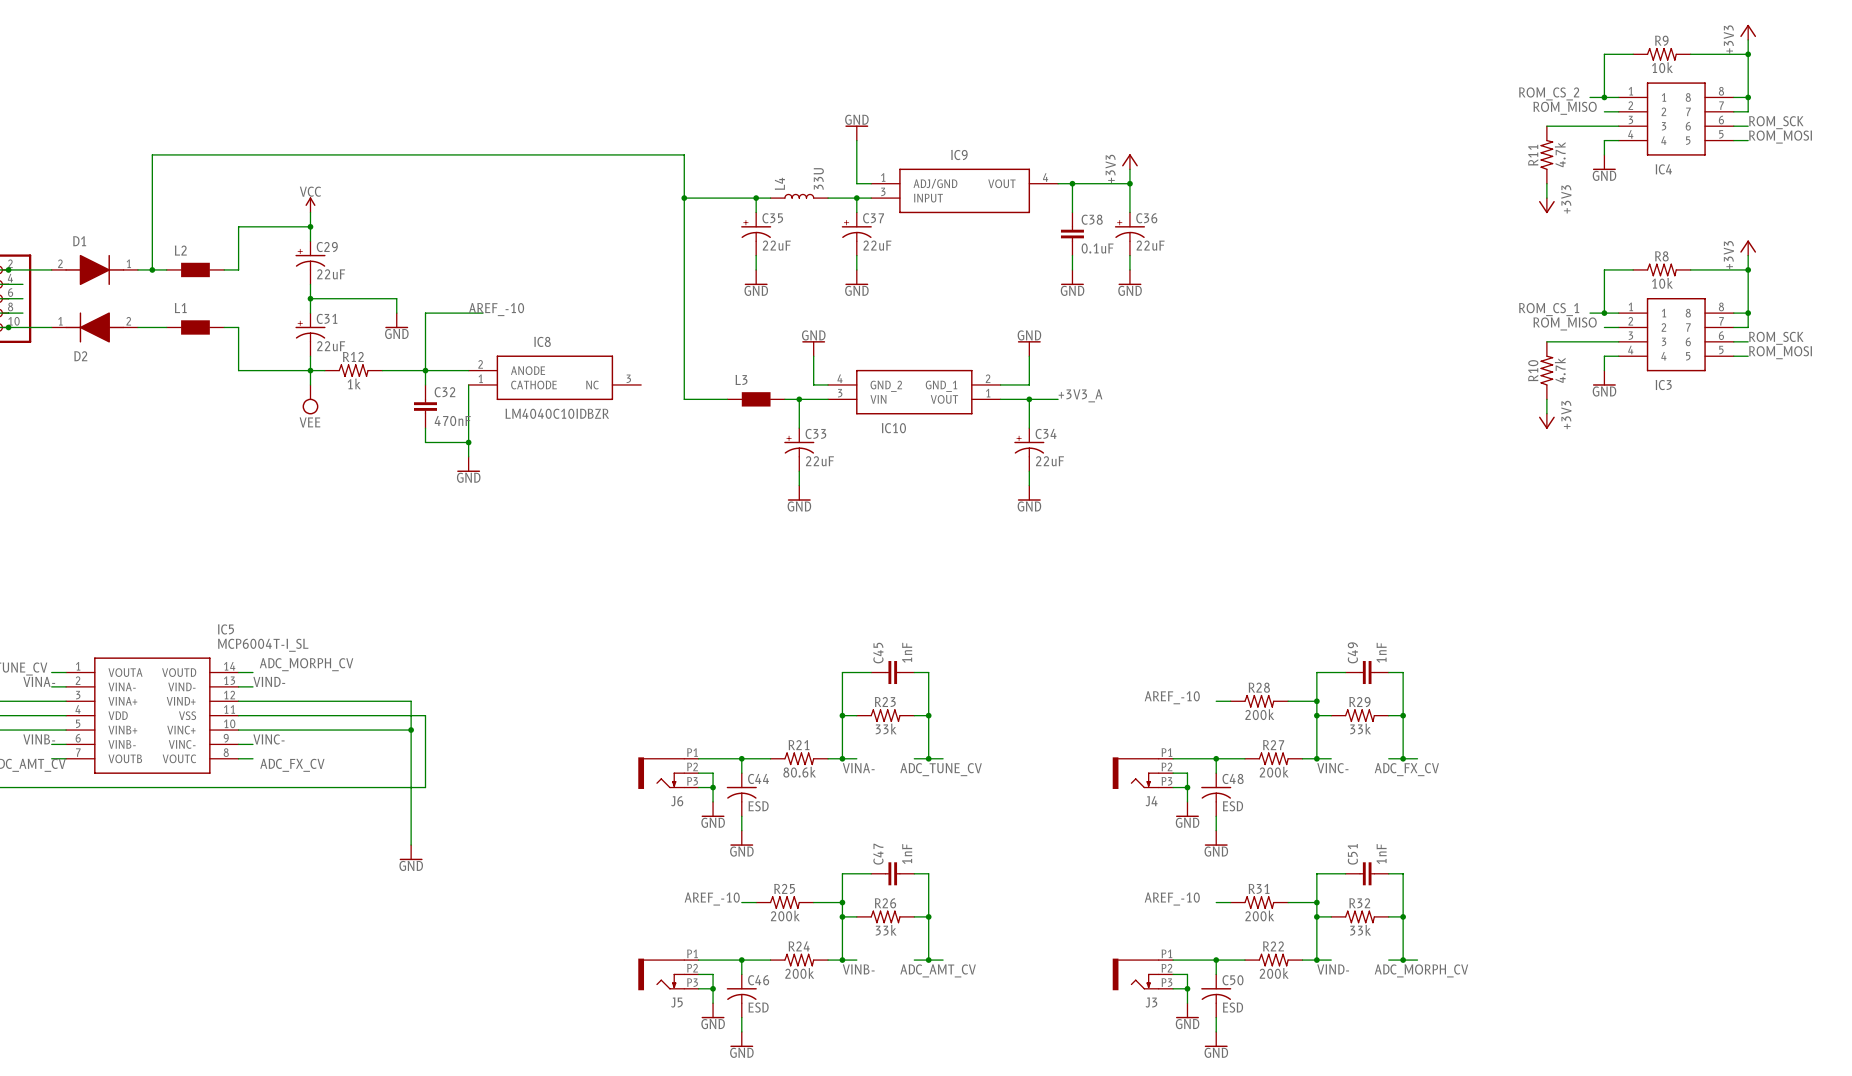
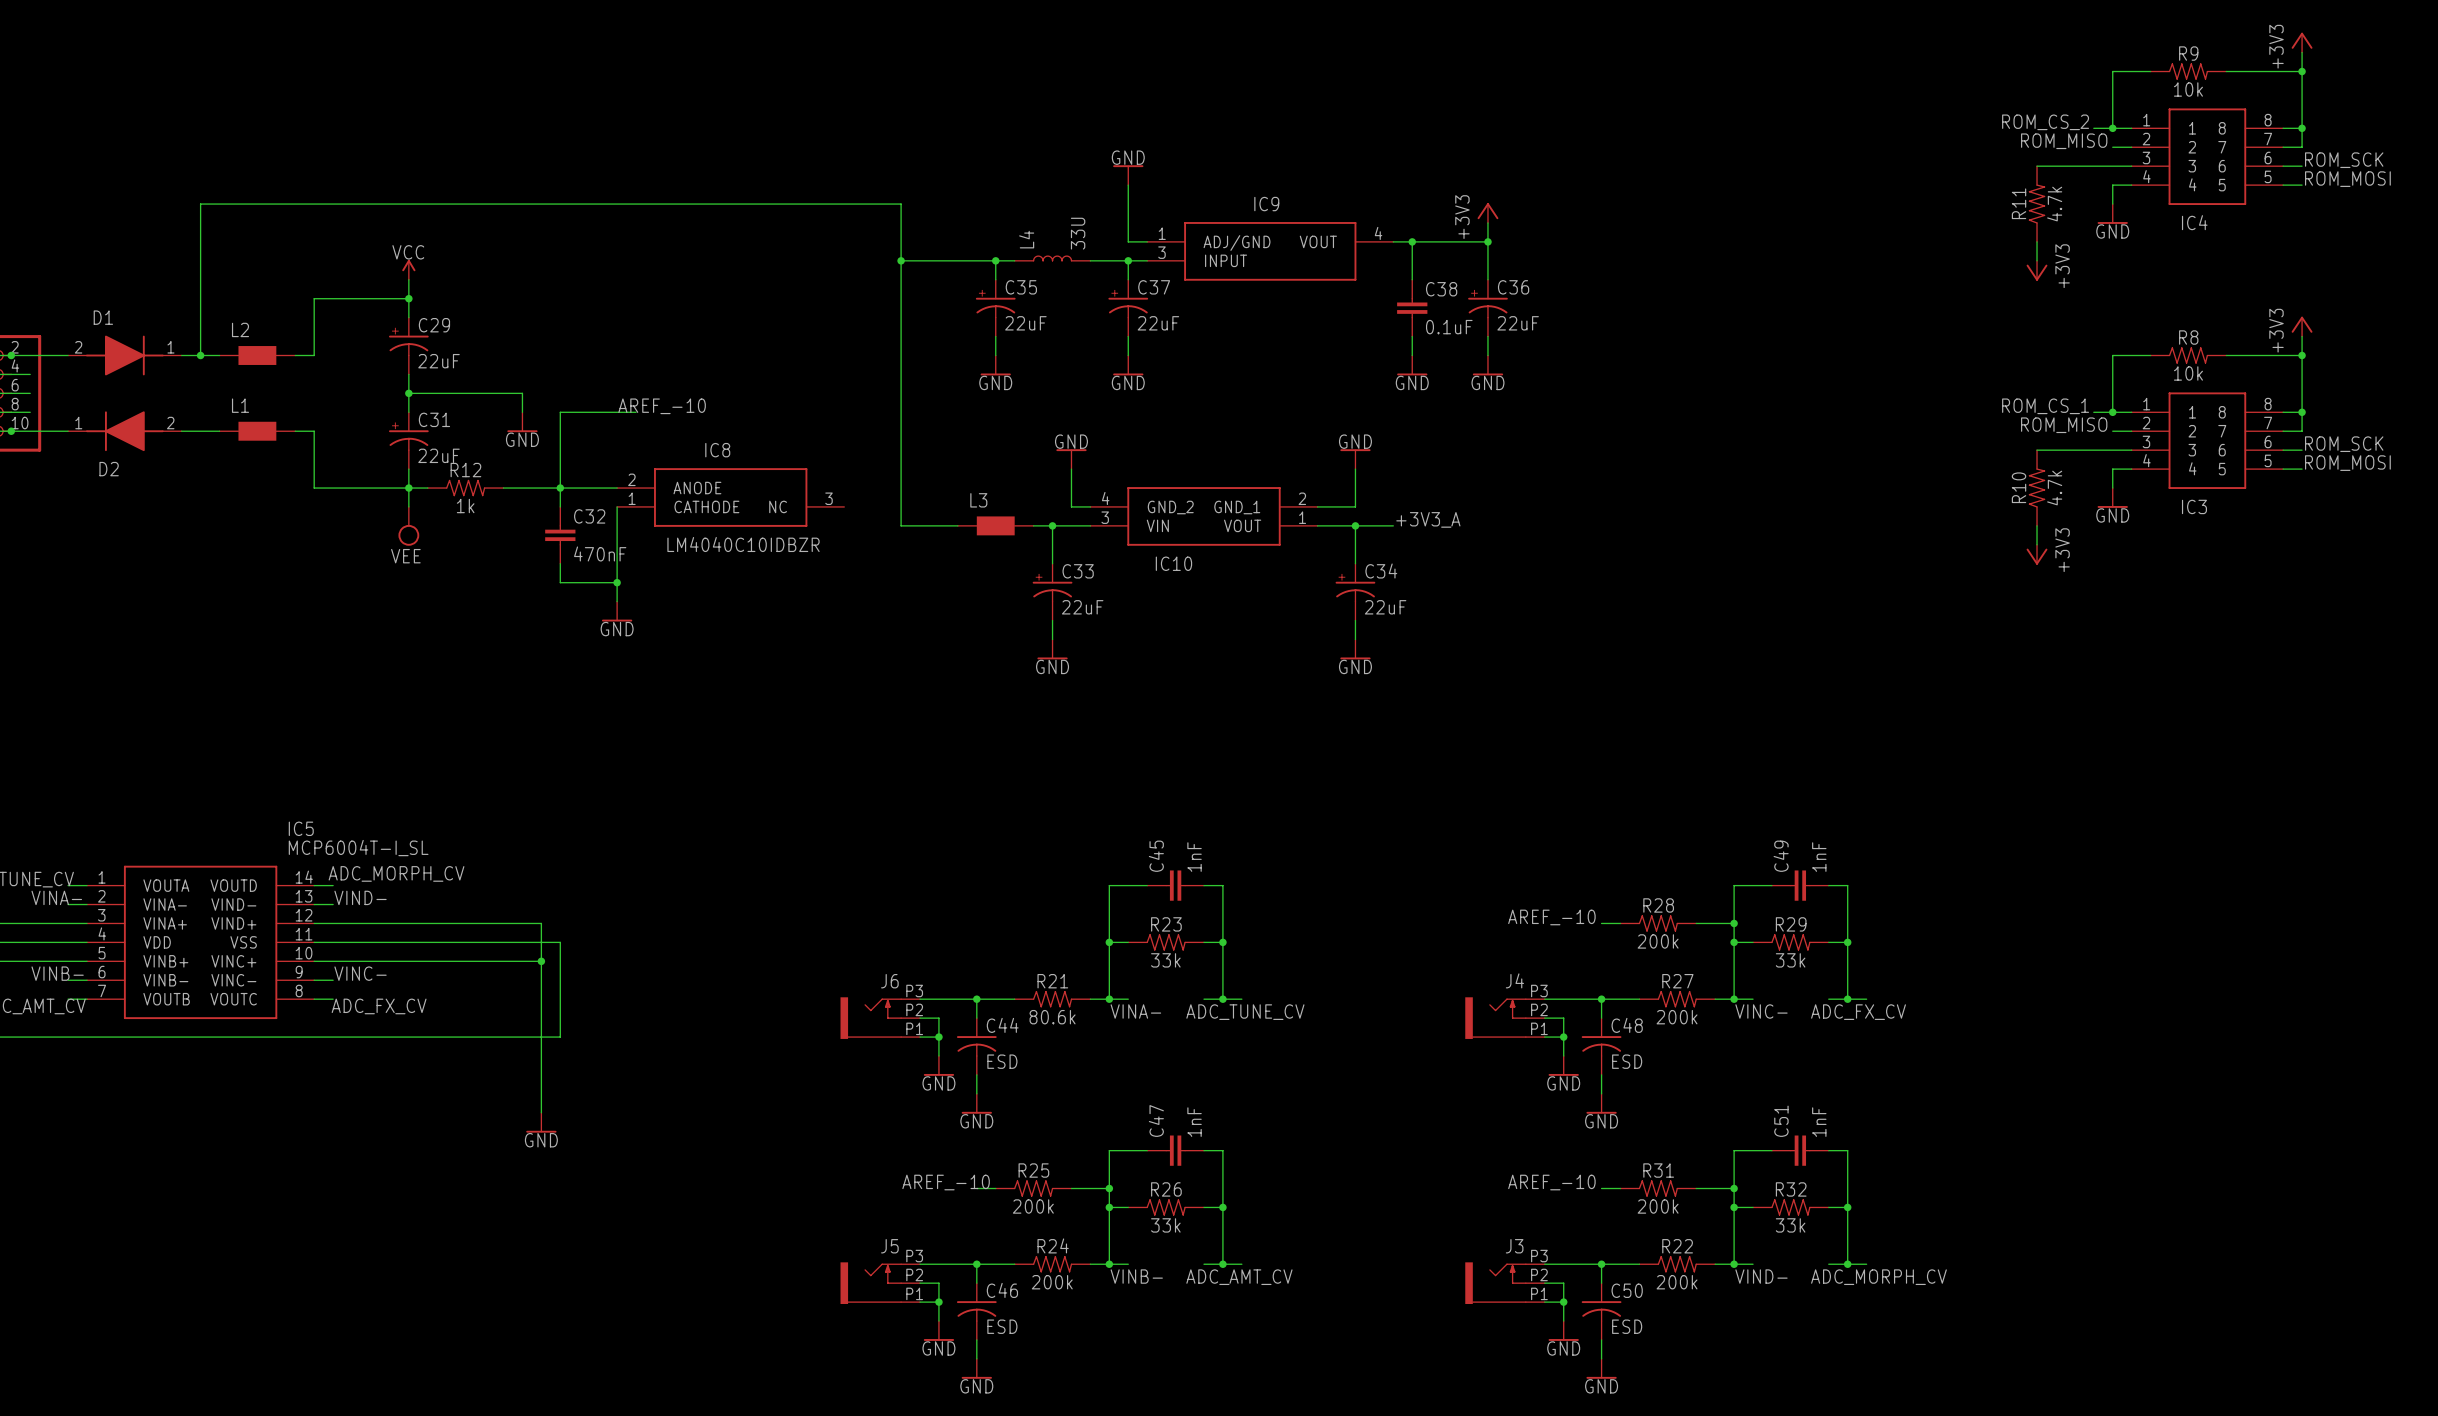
J6 flip: as is (661, 773) -> up-down (871, 1018)
J4 flip: as is (1135, 773) -> up-down (1495, 1018)
J5 flip: as is (661, 974) -> up-down (871, 1283)
J3 flip: as is (1135, 974) -> up-down (1495, 1283)

